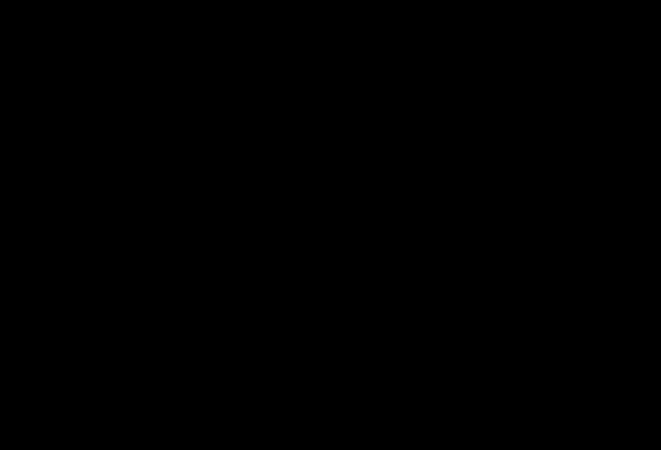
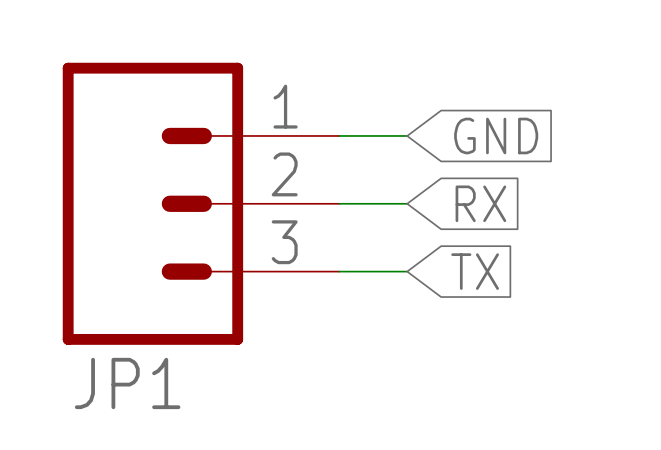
wire: none -> (339, 135) (407, 135)
global label: none -> GND (496, 135)
JP1: none -> (201, 203)
wire: none -> (339, 203) (407, 203)
global label: none -> RX (480, 203)
wire: none -> (339, 271) (407, 271)
global label: none -> TX (475, 271)

